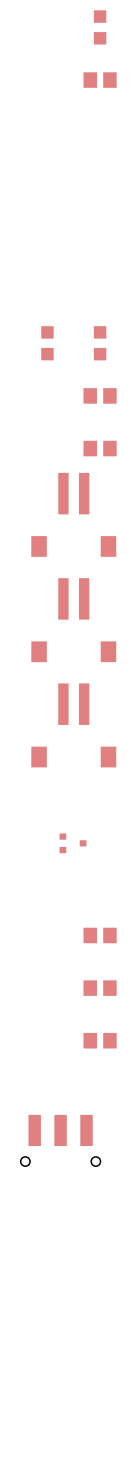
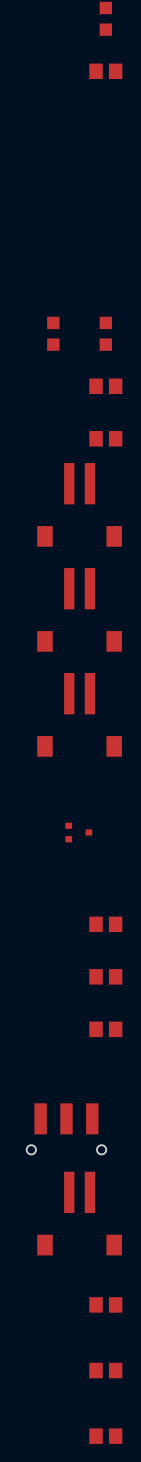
part: none -> (79, 1213)
part: none -> (105, 1304)
part: none -> (105, 1370)
part: none -> (105, 1436)

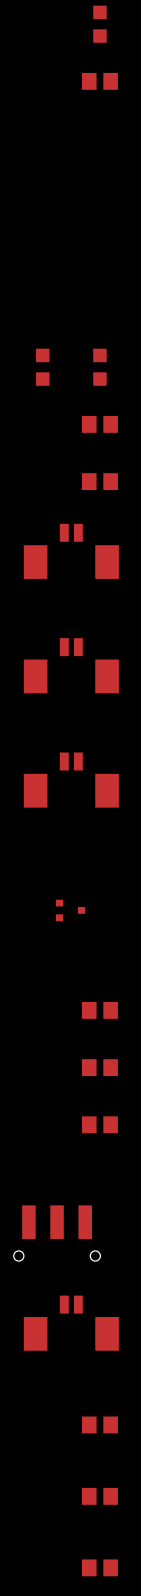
part footprint: [37, 463, 122, 547] -> [23, 523, 119, 579]
part footprint: [37, 568, 122, 652] -> [23, 638, 119, 694]
part footprint: [37, 673, 122, 757] -> [23, 752, 119, 808]
part footprint: [37, 1171, 122, 1256] -> [23, 1295, 119, 1351]

